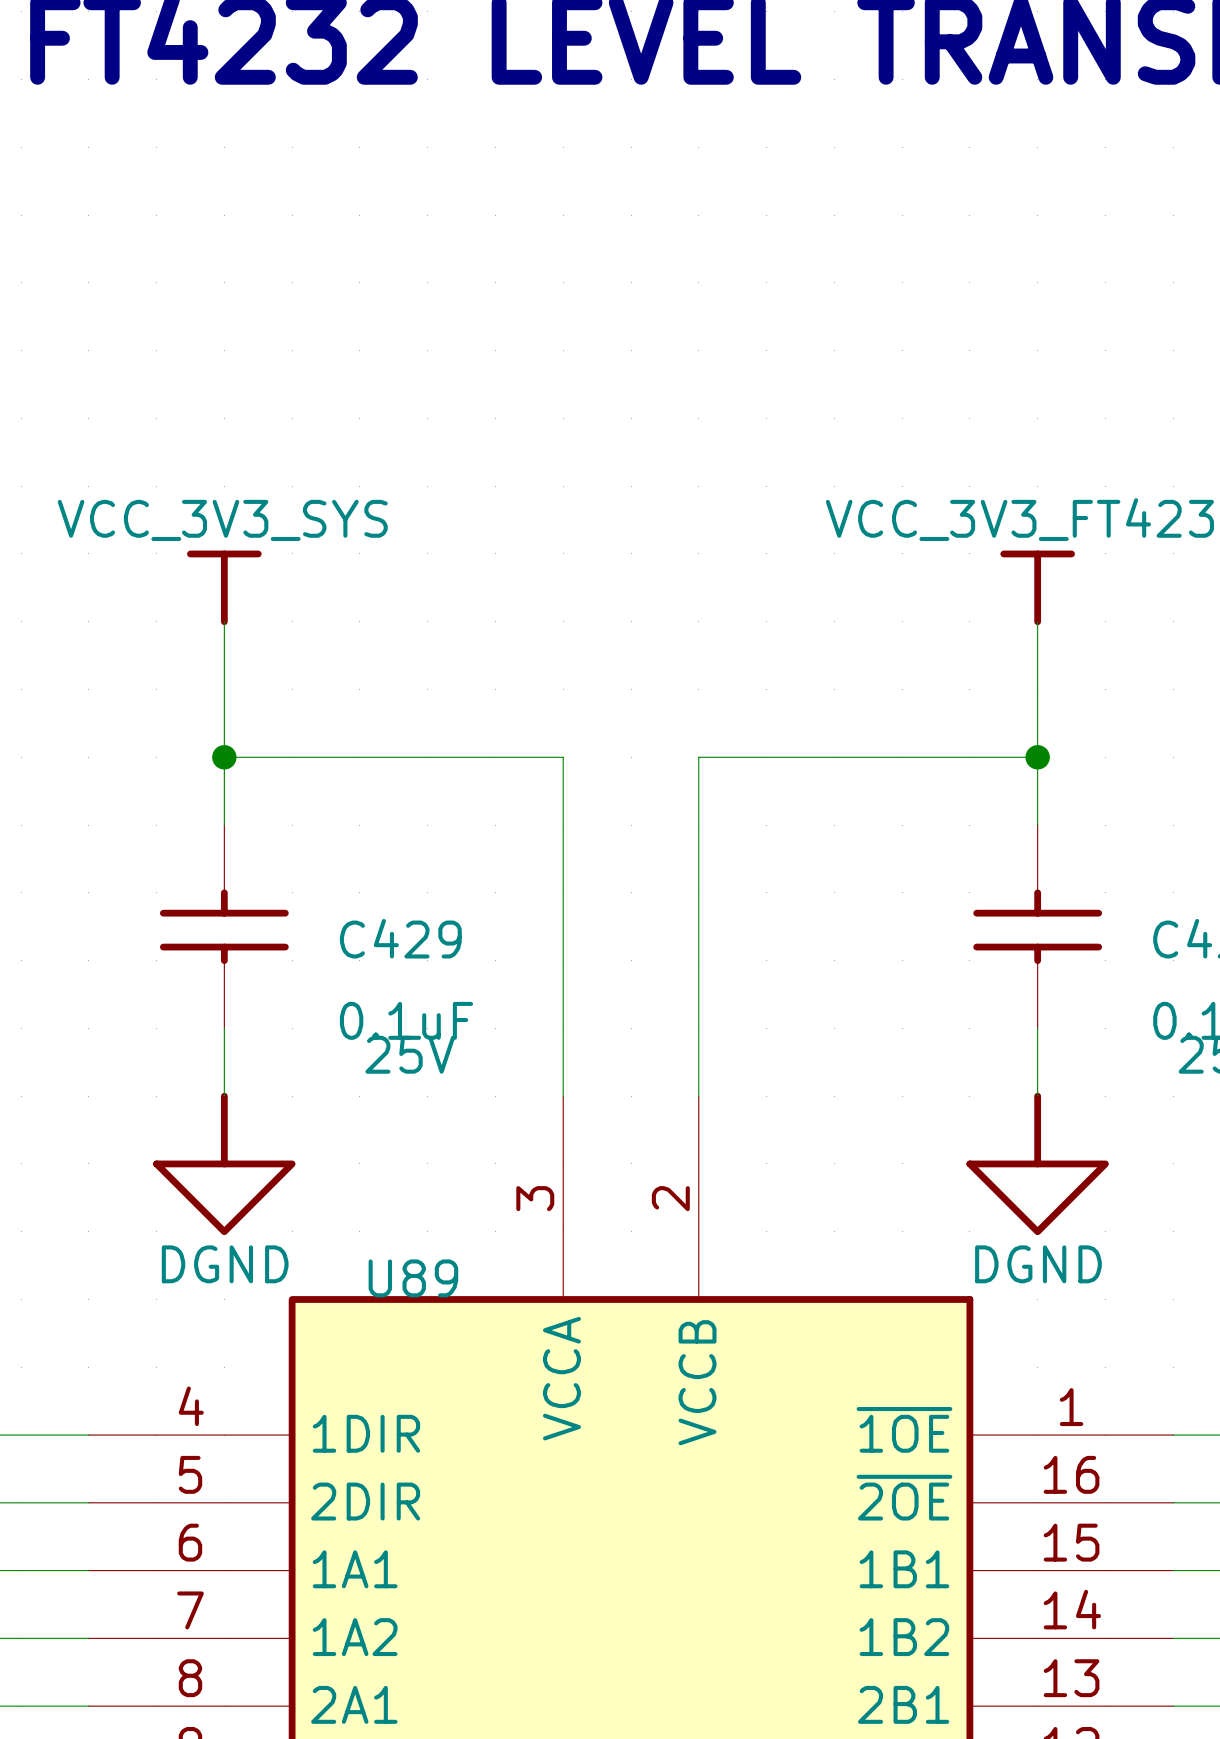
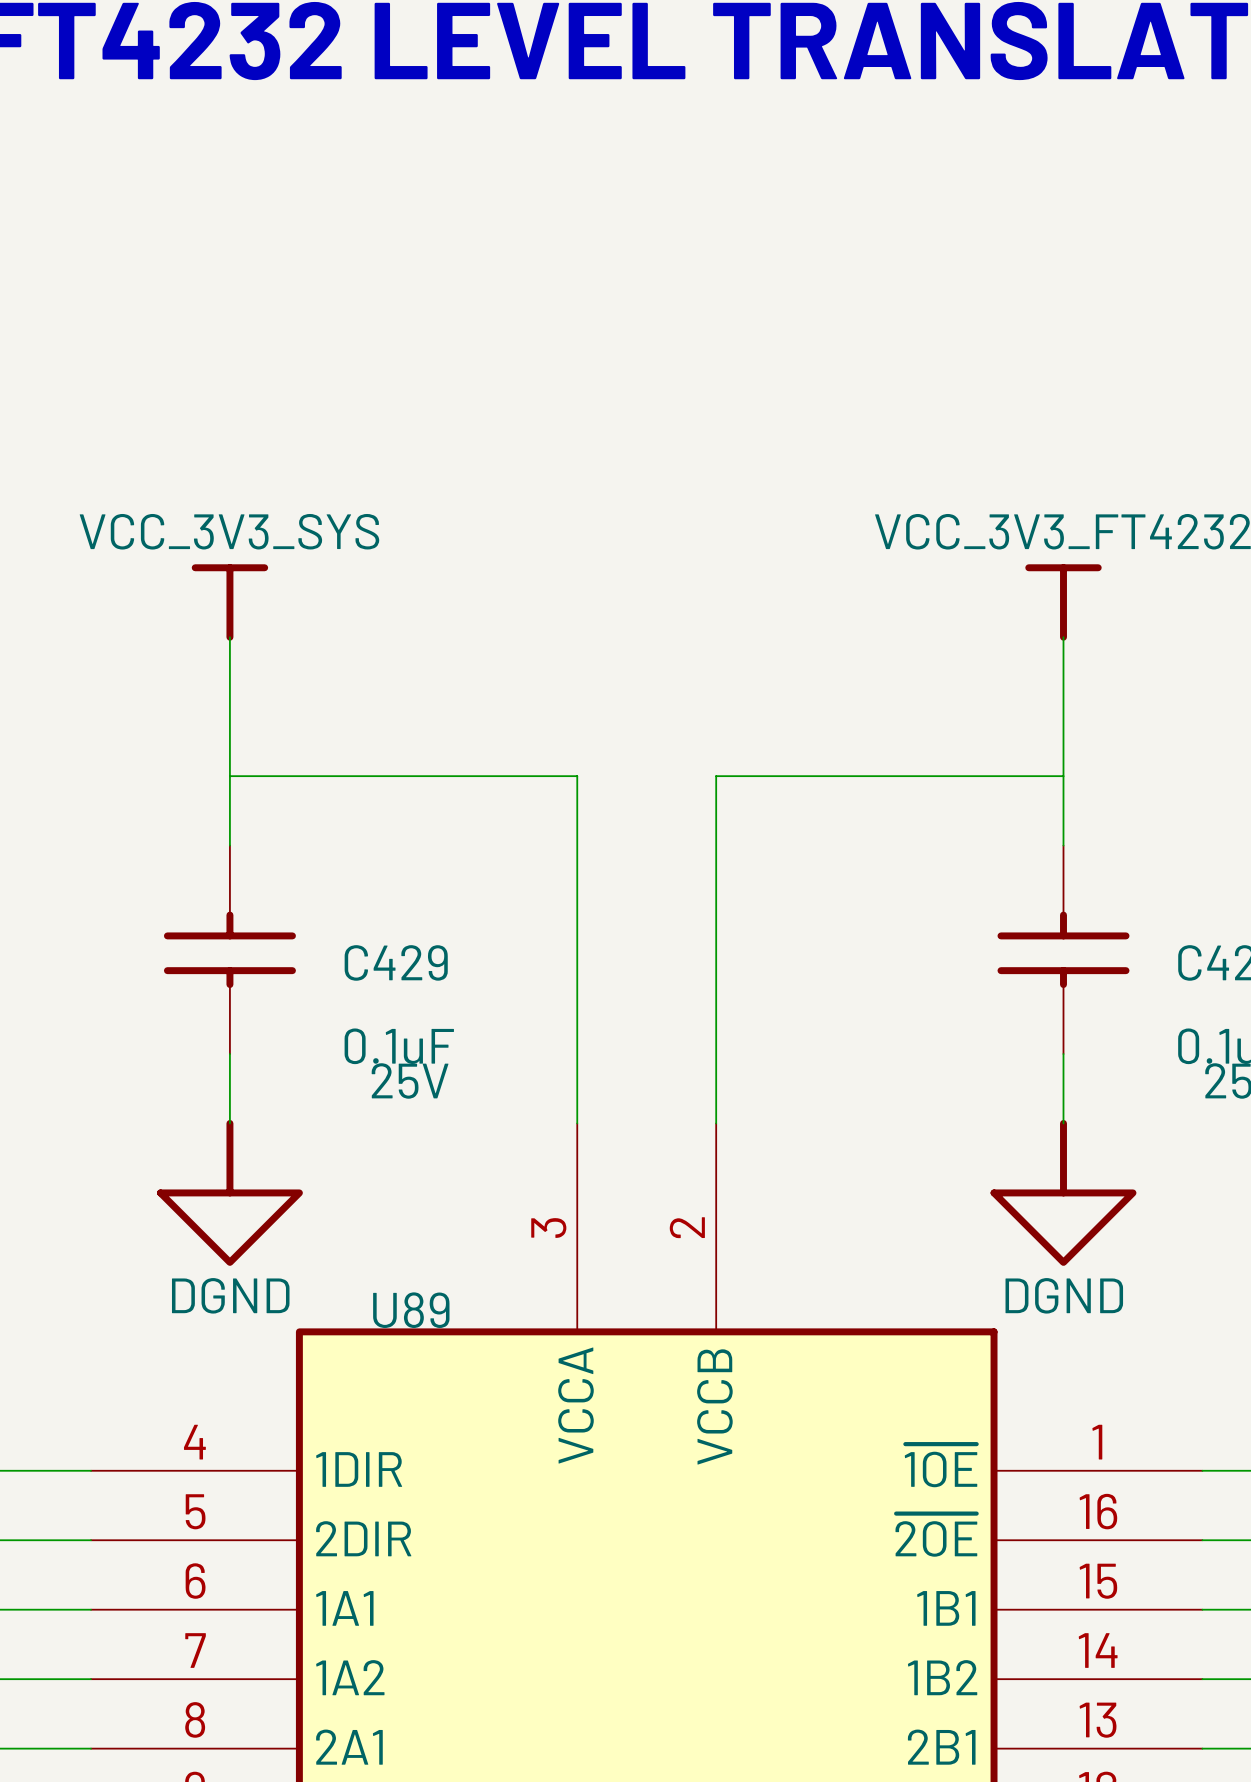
junction: (224, 757) -> none
junction: (1037, 757) -> none

